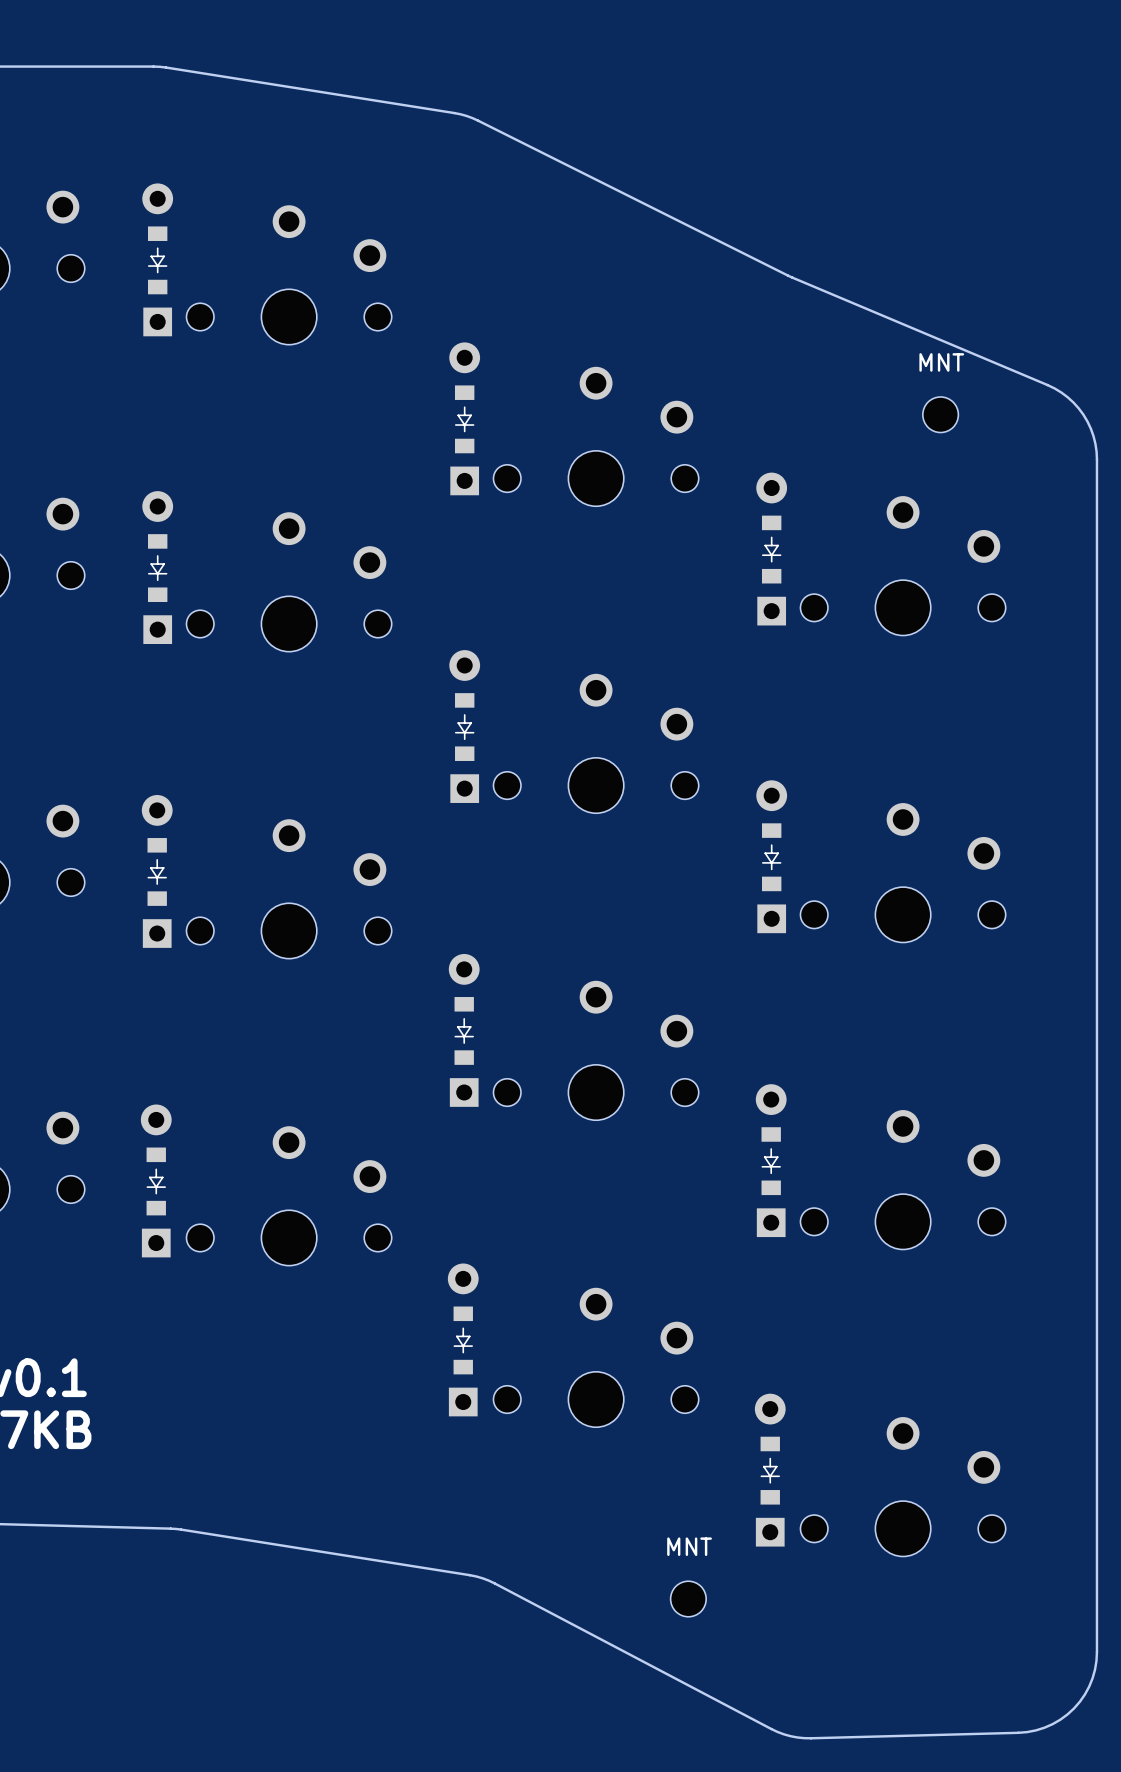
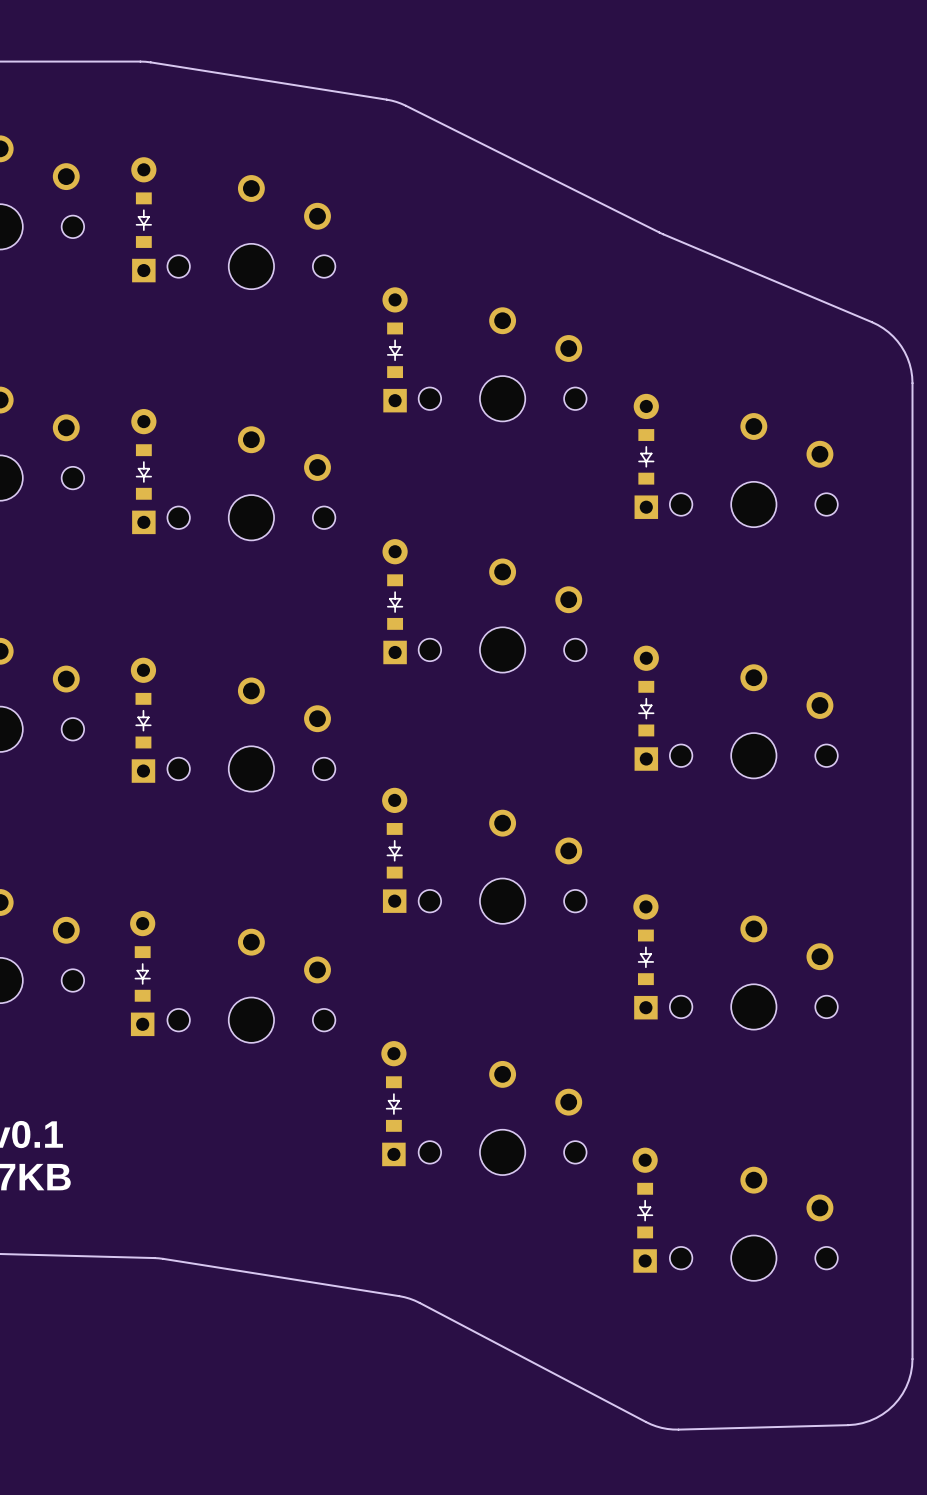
MNT: (940, 414) -> none
MNT: (688, 1599) -> none

